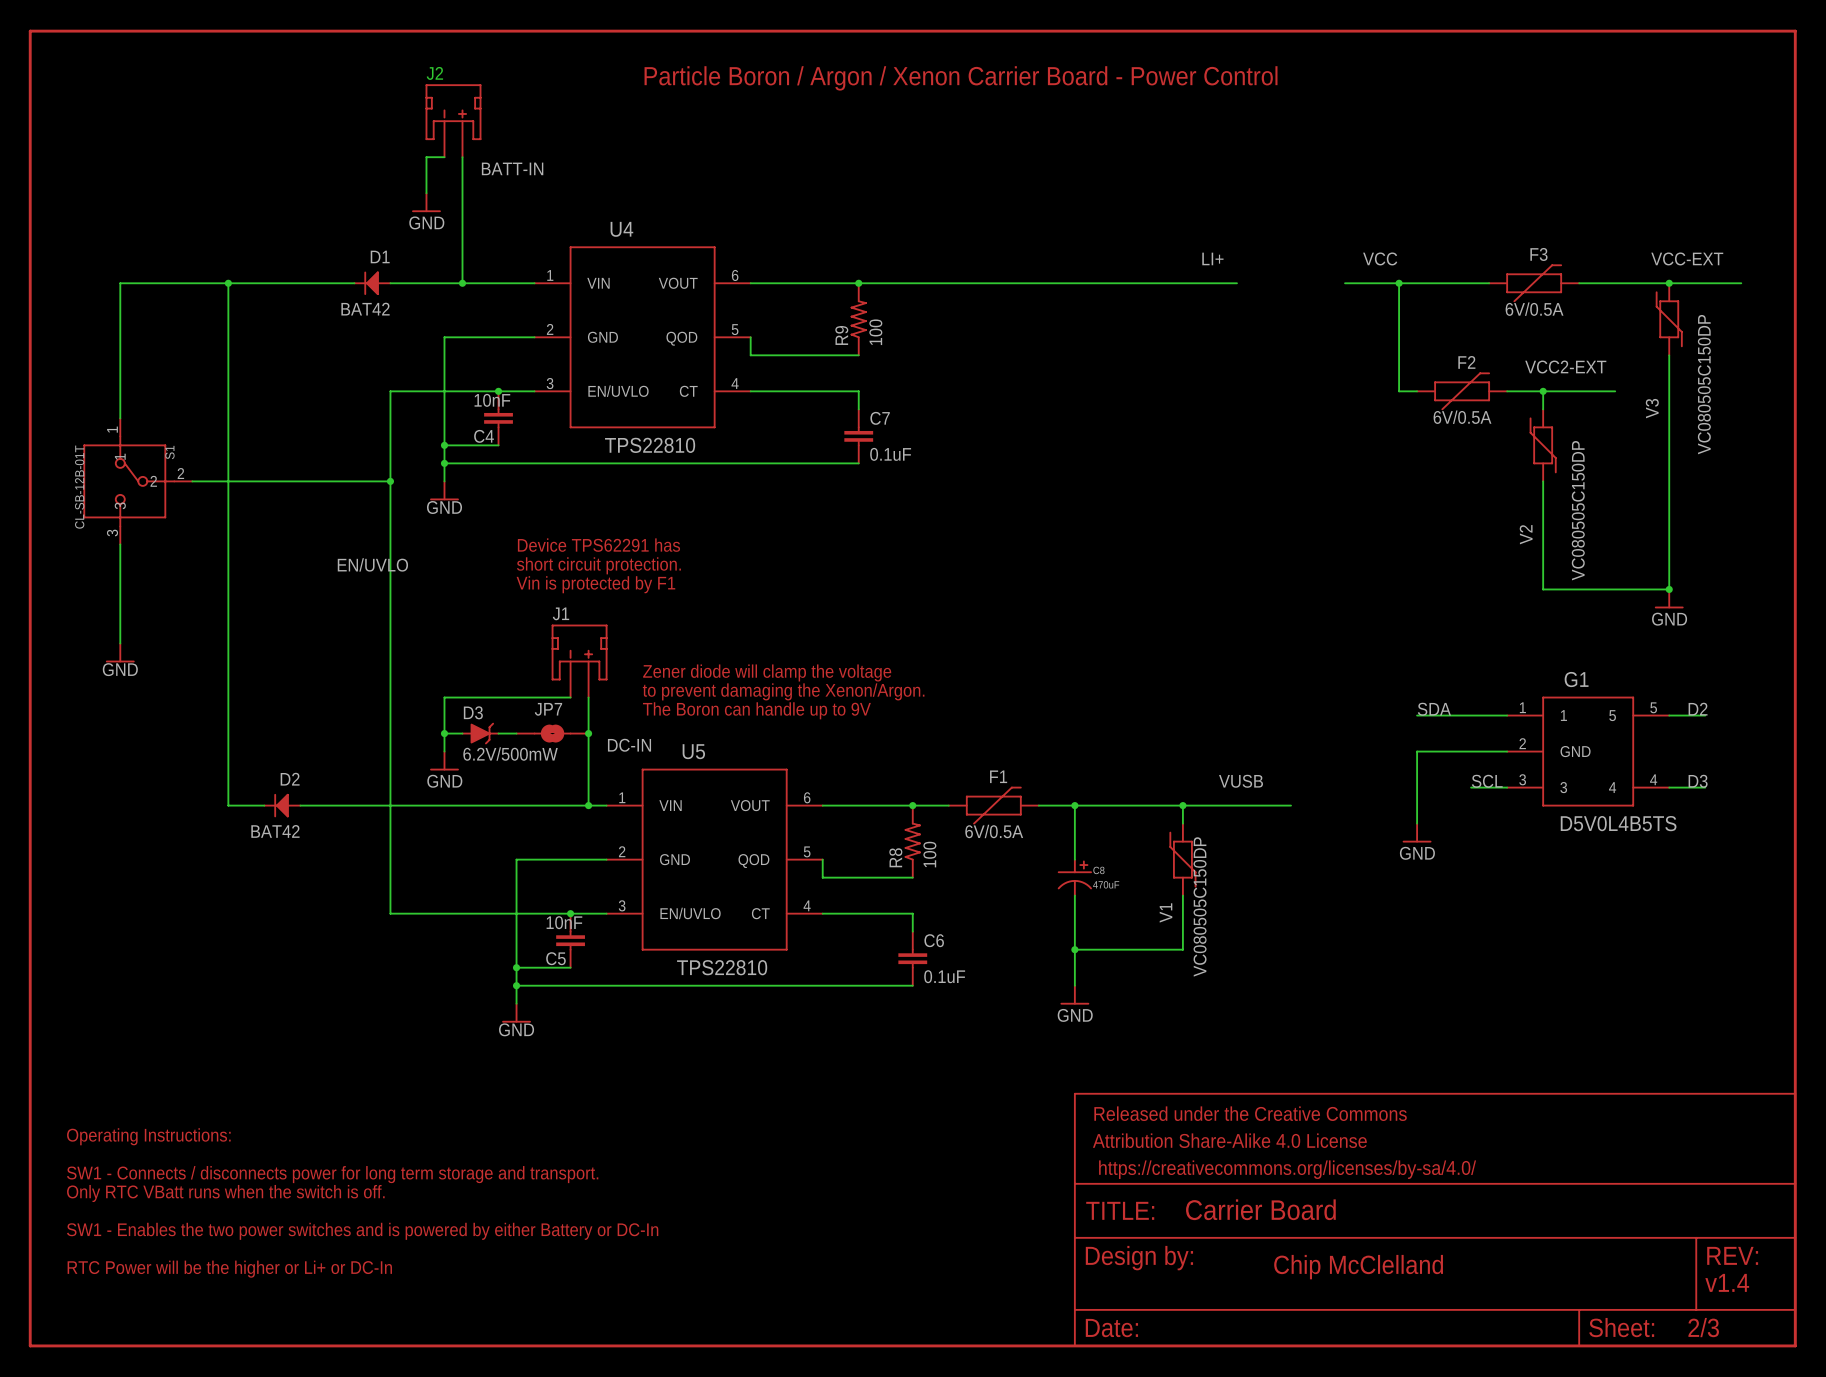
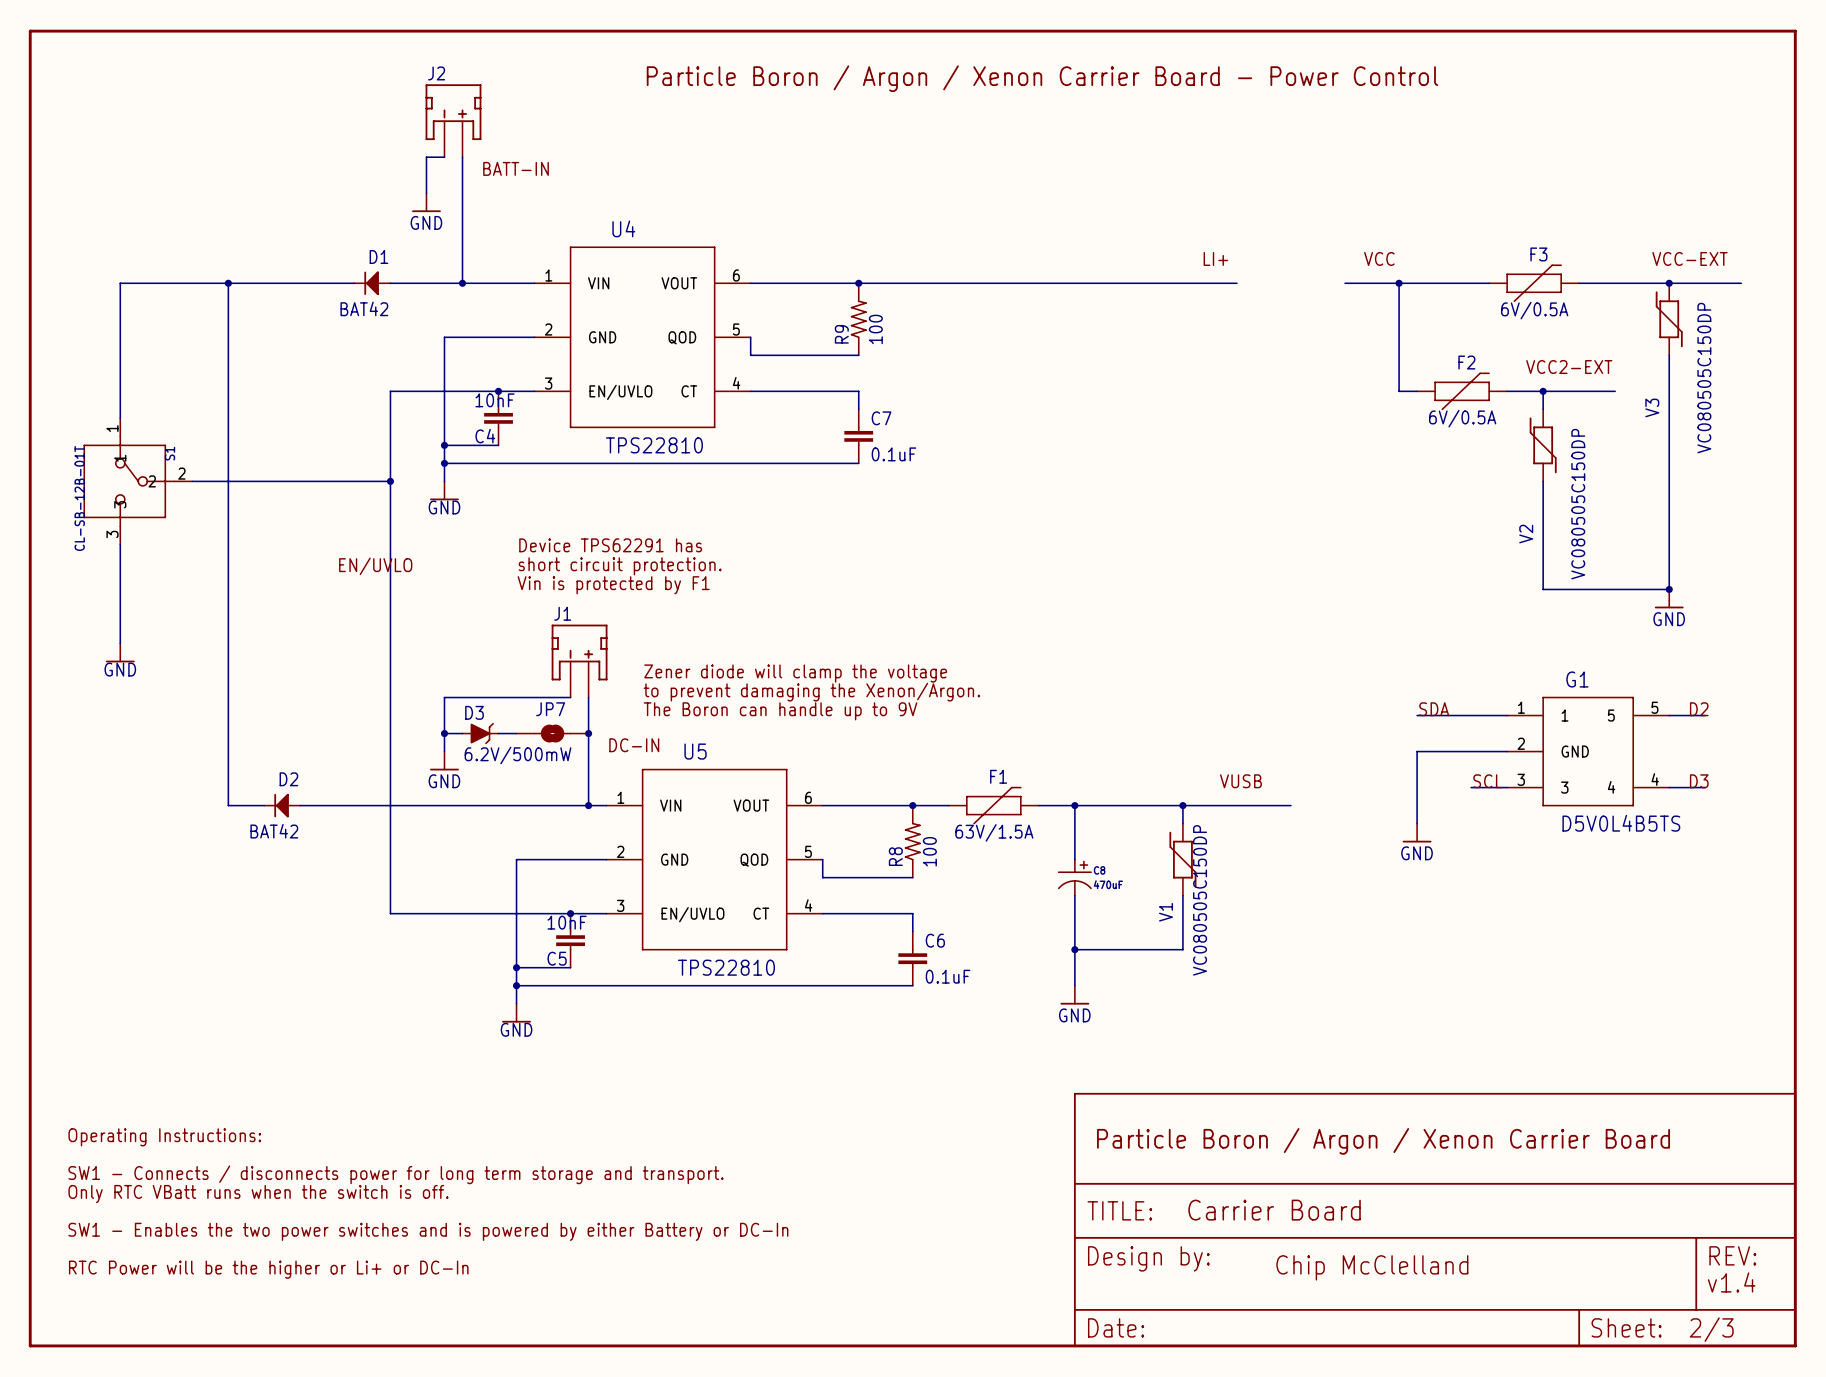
F1 value: 6V/0.5A (994, 831) -> 63V/1.5A (994, 832)
part text: Released under the Creative Commons (1250, 1113) -> none
part text: Attribution Share-Alike 4.0 License (1229, 1140) -> none
text: none -> Particle Boron / Argon / Xenon Carrier Board (1383, 1141)
part text: https://creativecommons.org/licenses/by-sa/4.0/ (1287, 1169) -> none

